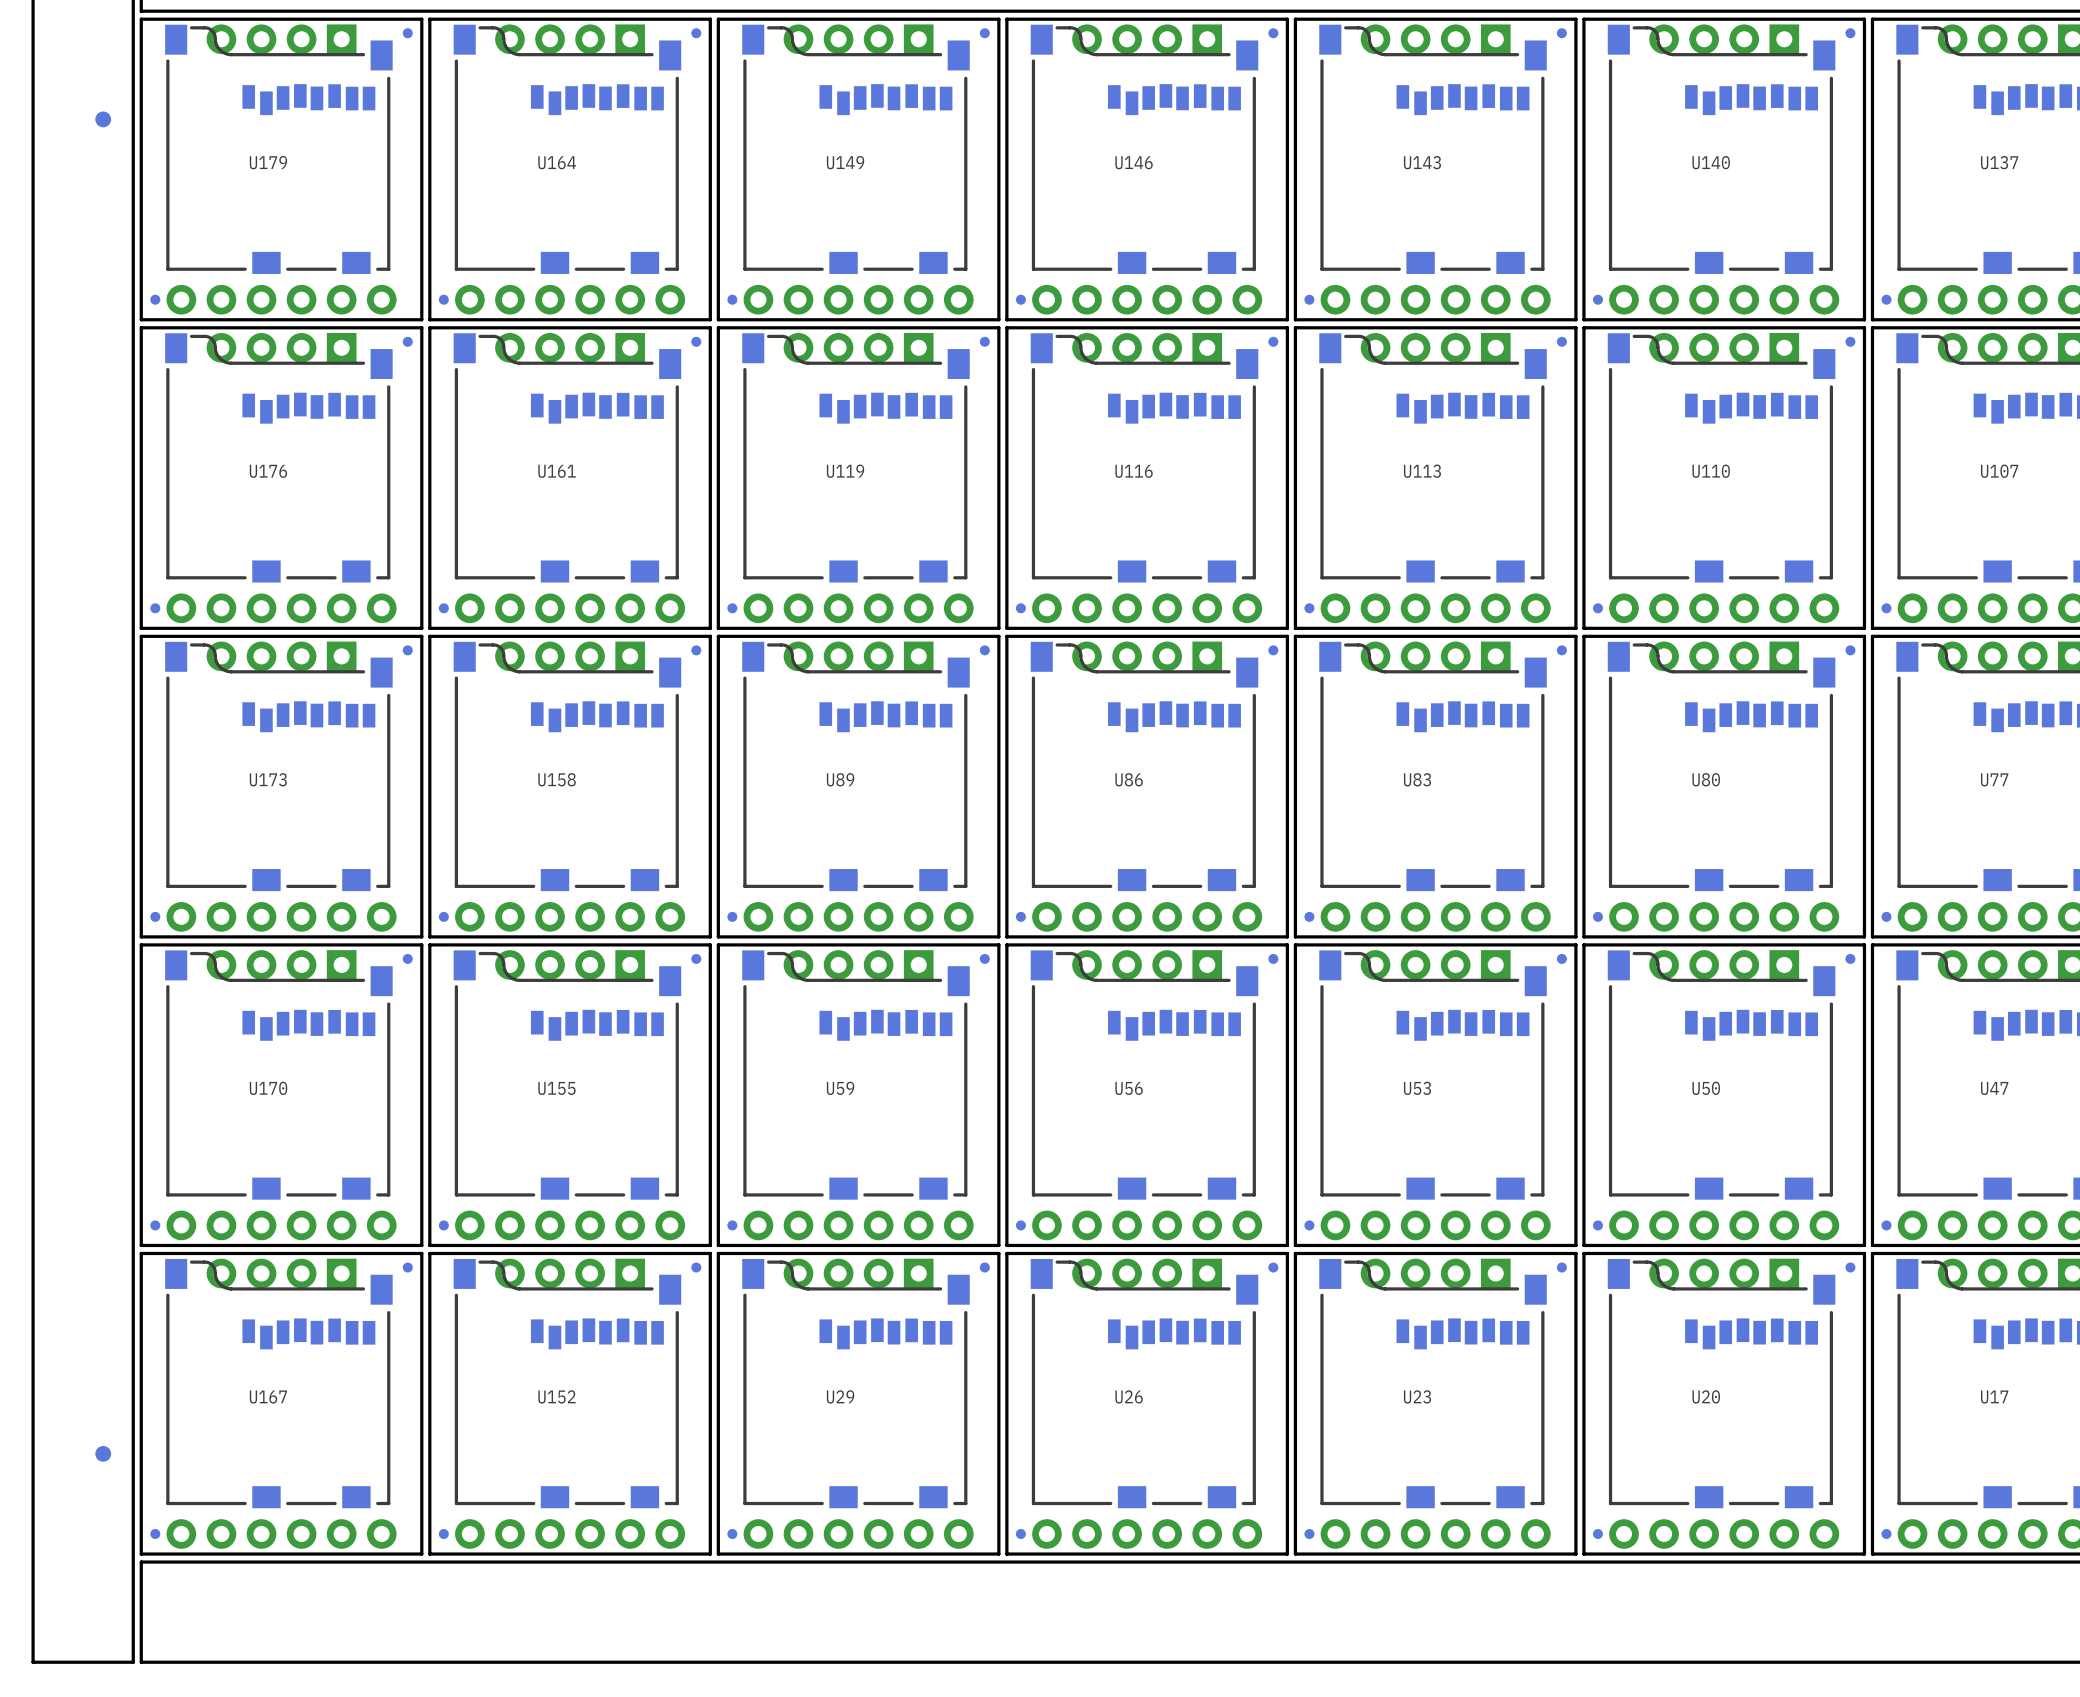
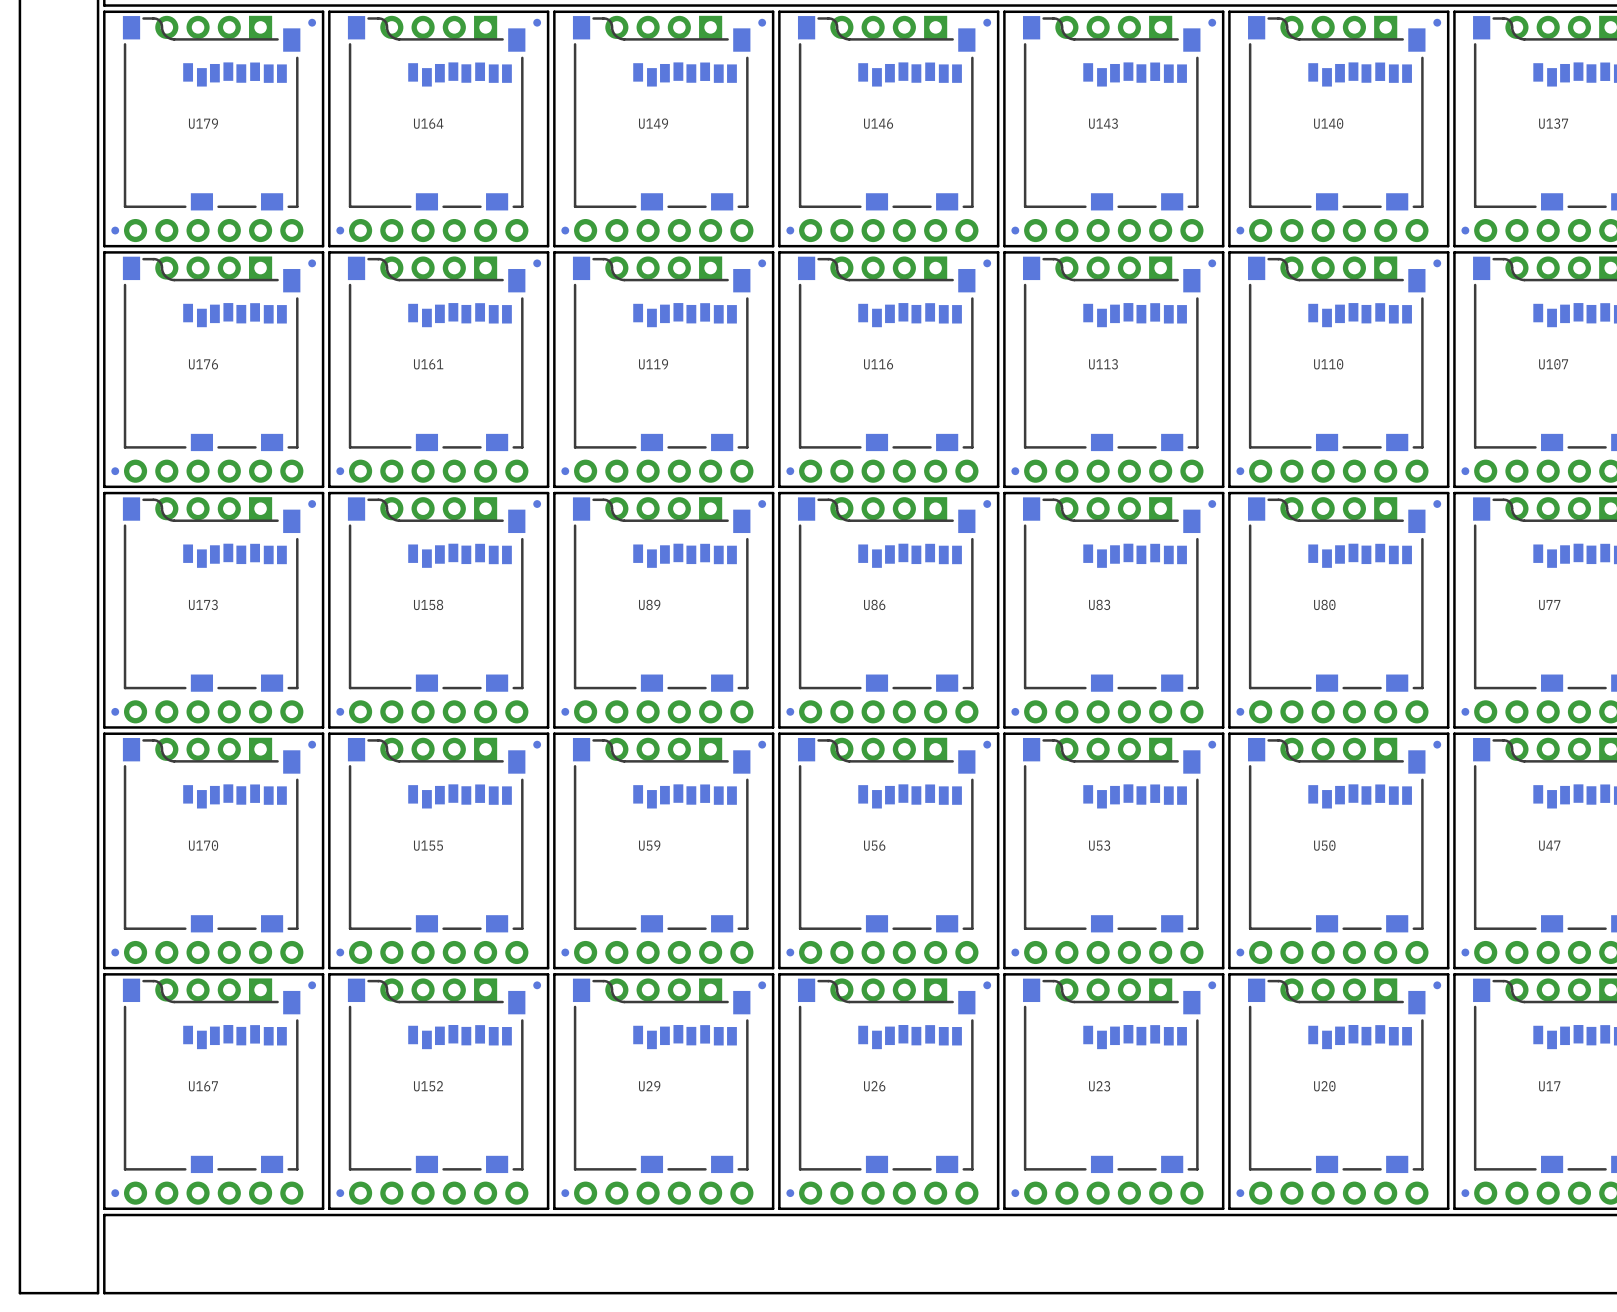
part: (103, 119) -> none
part: (103, 1453) -> none

